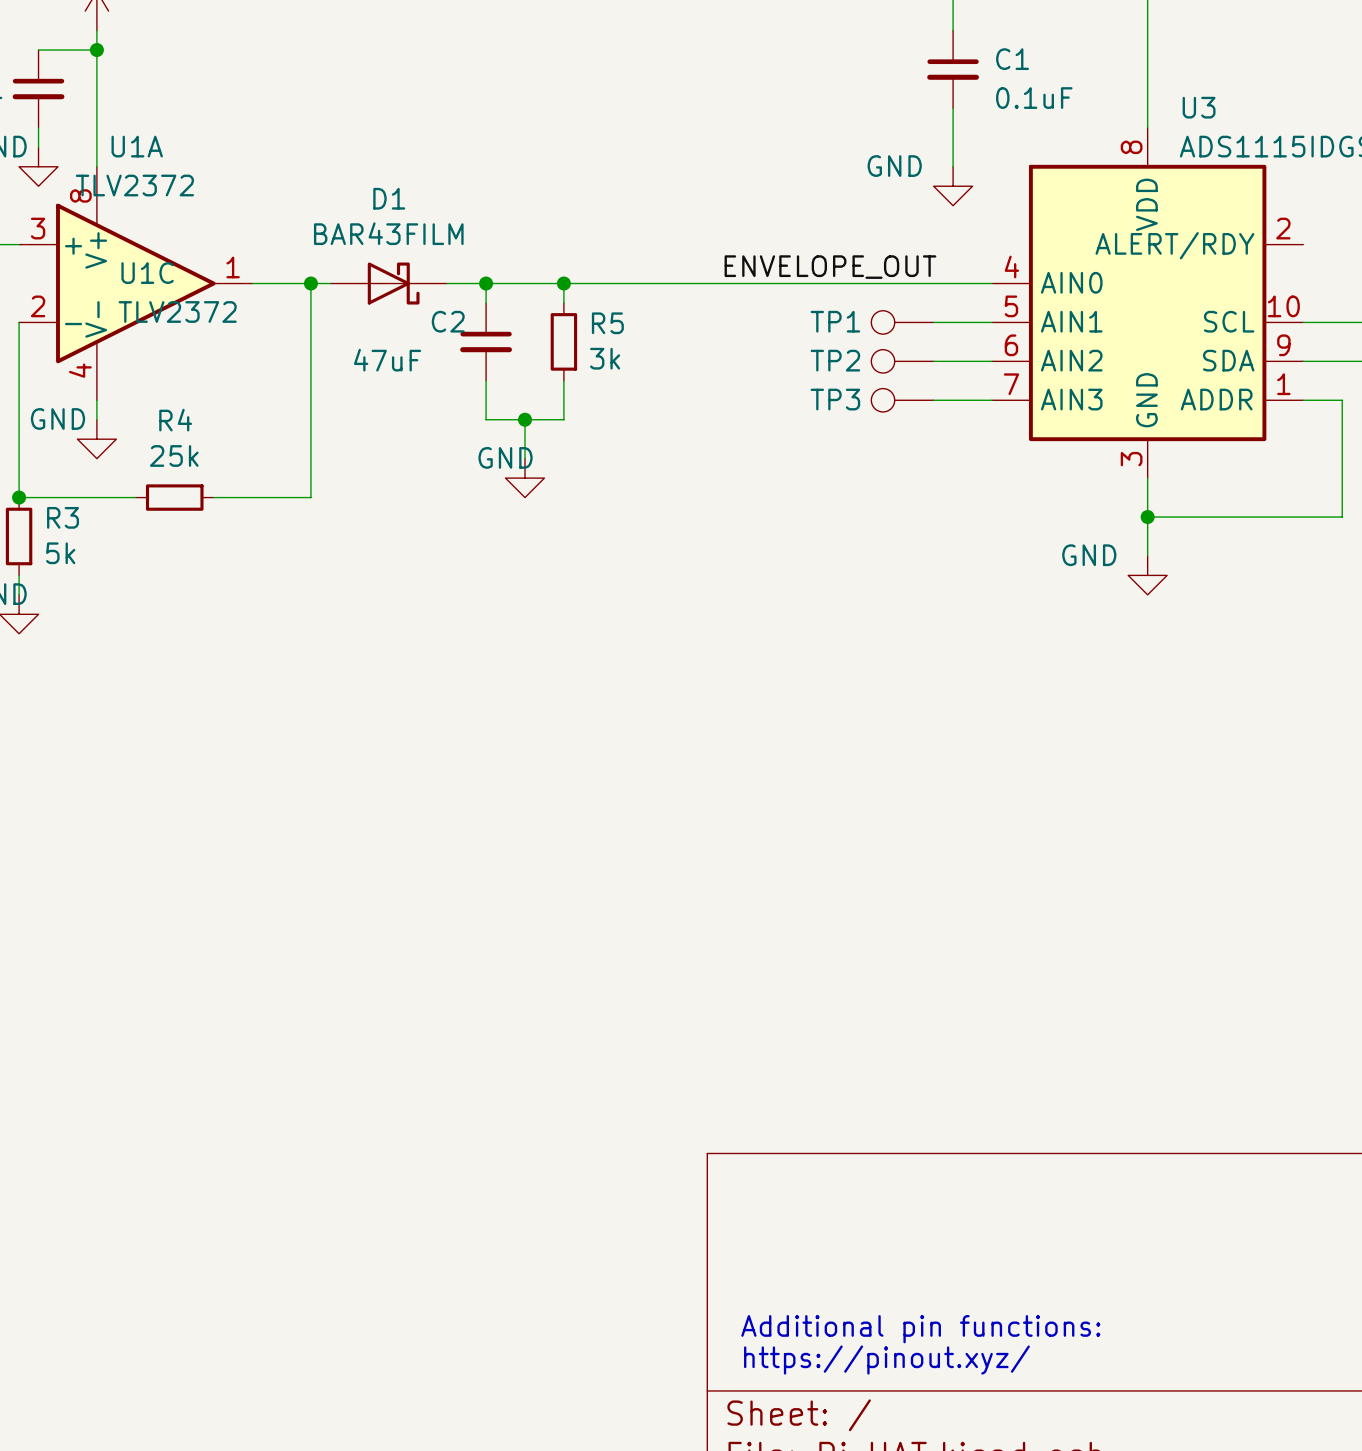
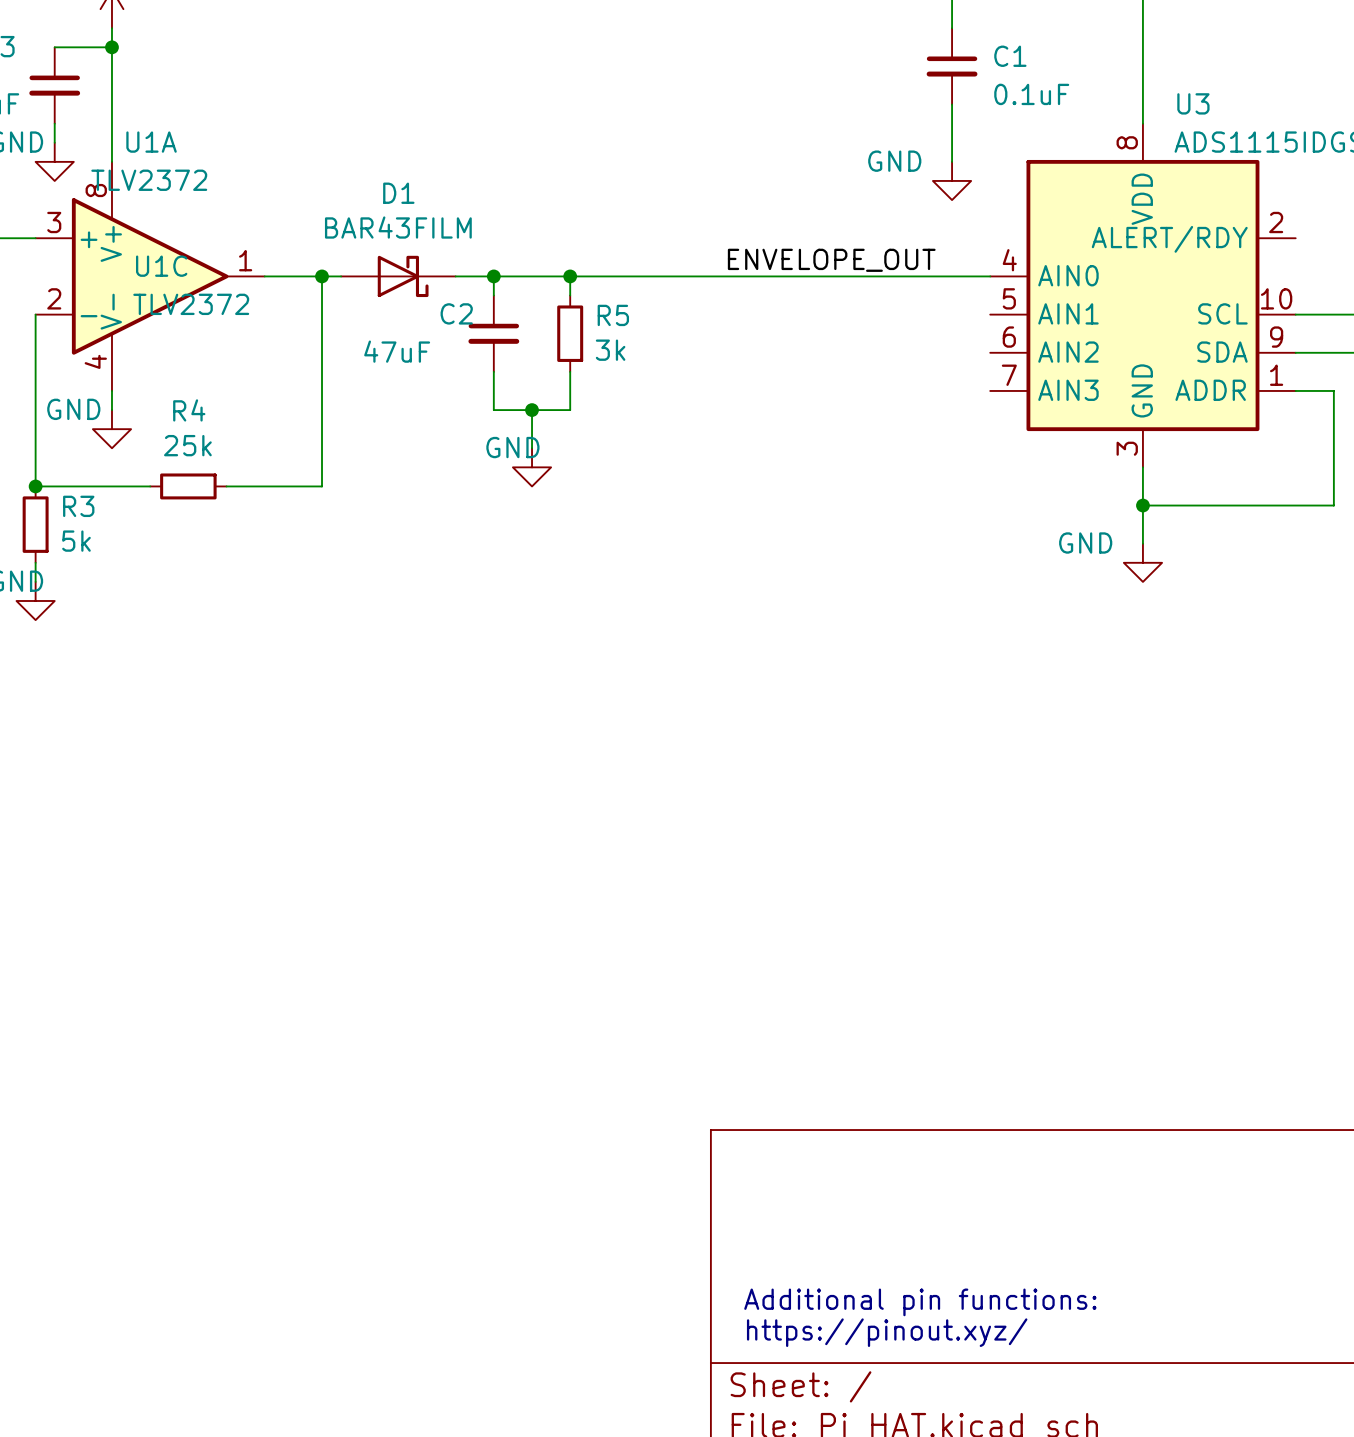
TP1: (902, 322) -> none
wire: (933, 322) (991, 322) -> none
TP2: (902, 361) -> none
wire: (933, 361) (991, 361) -> none
TP3: (902, 400) -> none
wire: (933, 400) (991, 400) -> none

